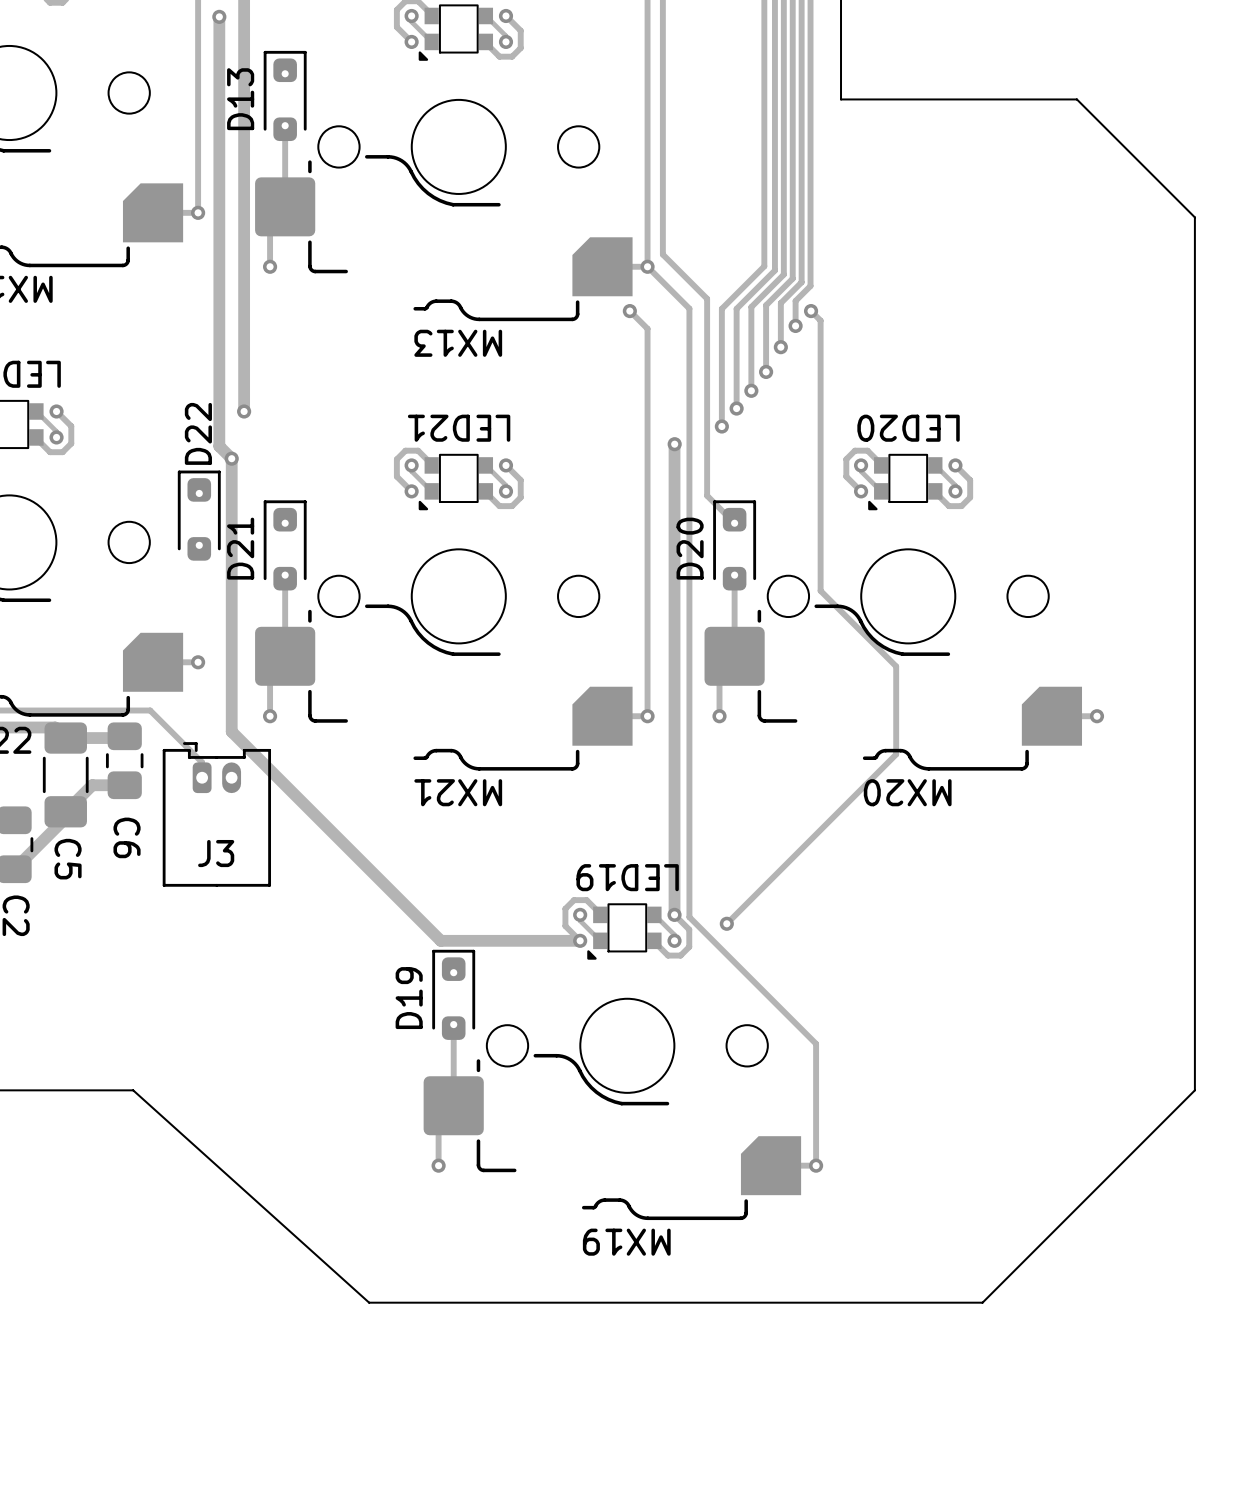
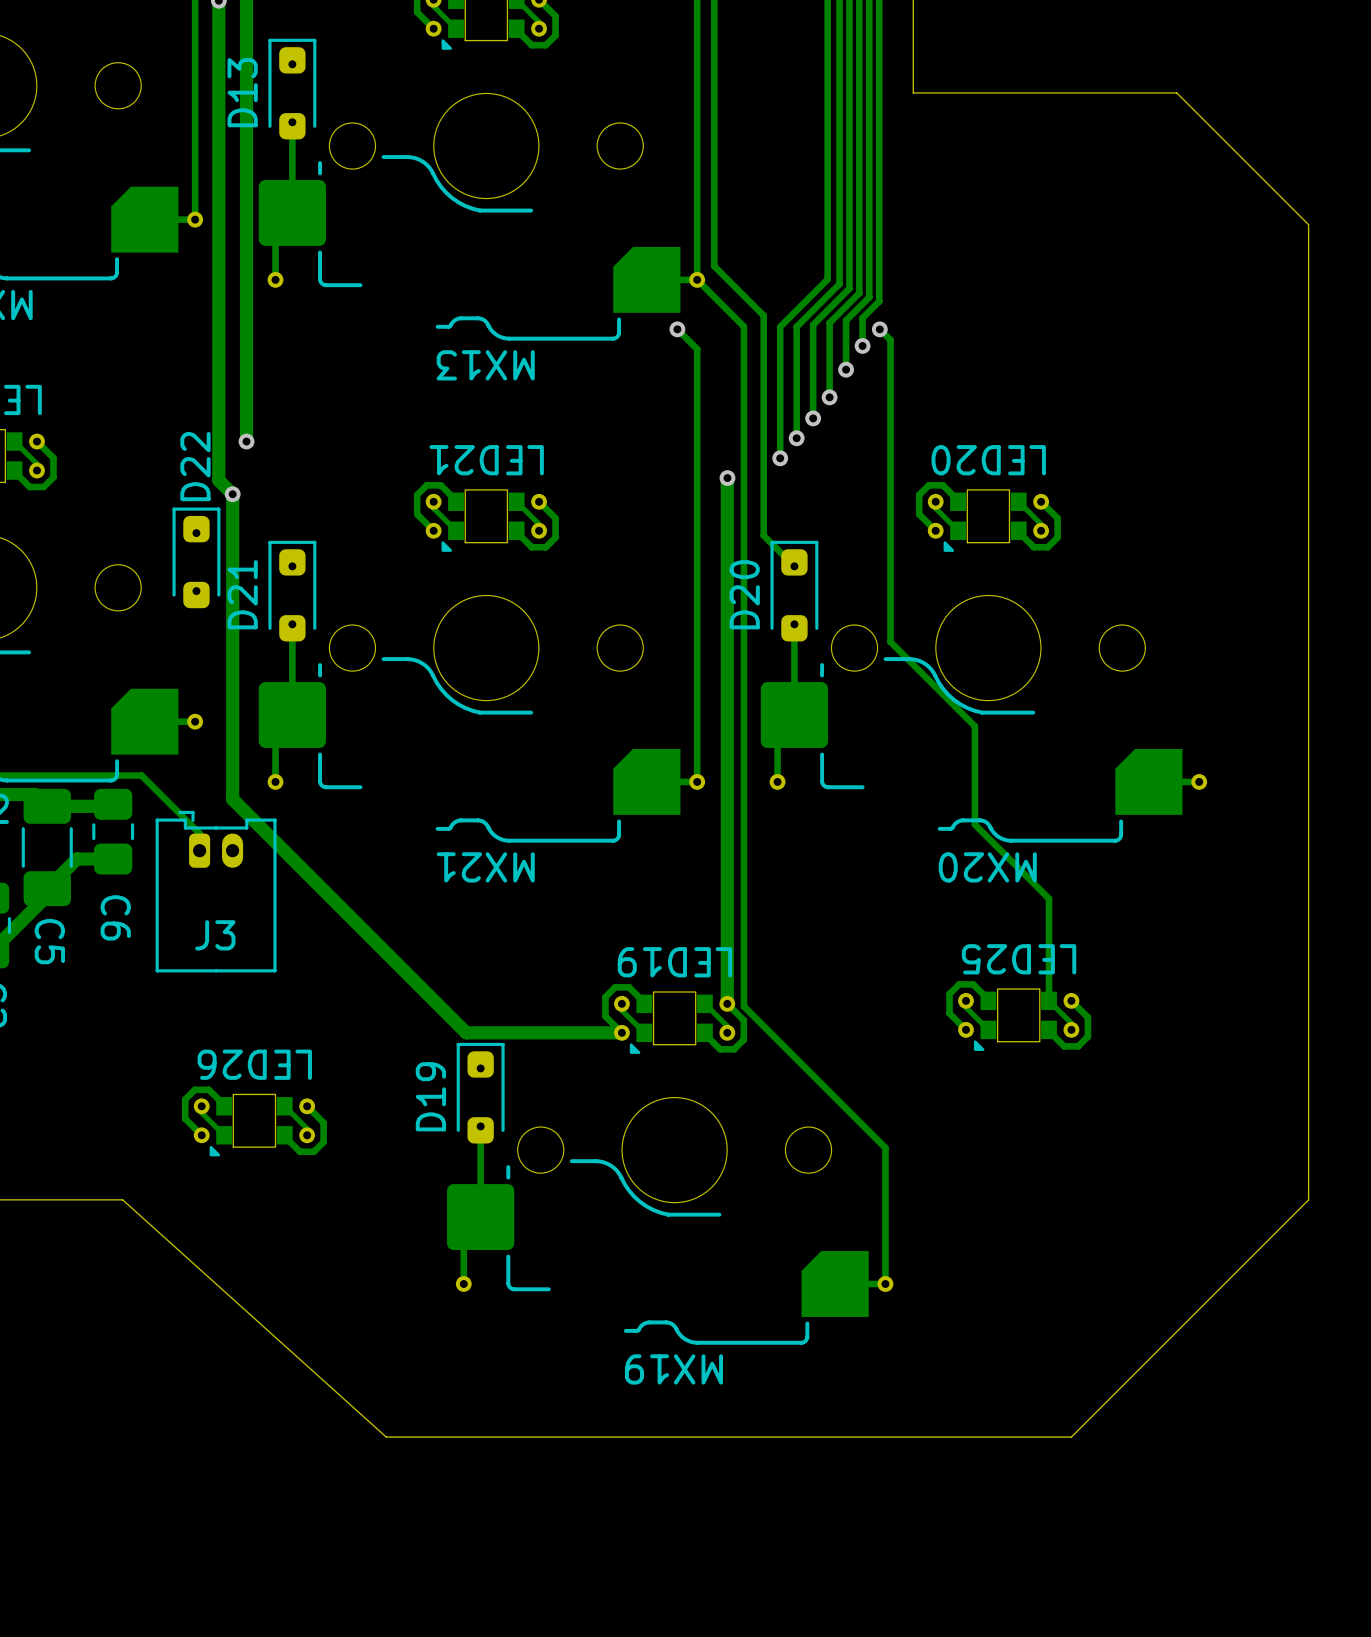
track: (896, 754) (726, 923) -> (974, 824) (1049, 898) (1049, 1000) (1071, 1023) (1071, 1029)
track: none -> (966, 1000) (966, 1007) (988, 1029)
track: none -> (988, 1000) (973, 984) (959, 984) (949, 994) (949, 1013) (966, 1029)
track: none -> (1071, 1000) (1087, 1017) (1087, 1036) (1078, 1046) (1064, 1046) (1049, 1029)
via: (726, 923) -> none
LED25: none -> (1018, 1019)
track: none -> (201, 1106) (201, 1112) (224, 1135)
track: none -> (224, 1106) (208, 1089) (194, 1089) (185, 1099) (185, 1118) (201, 1135)
track: none -> (284, 1106) (307, 1128) (307, 1135)
track: none -> (307, 1106) (323, 1122) (323, 1142) (313, 1151) (299, 1151) (284, 1135)
LED26: none -> (254, 1125)

